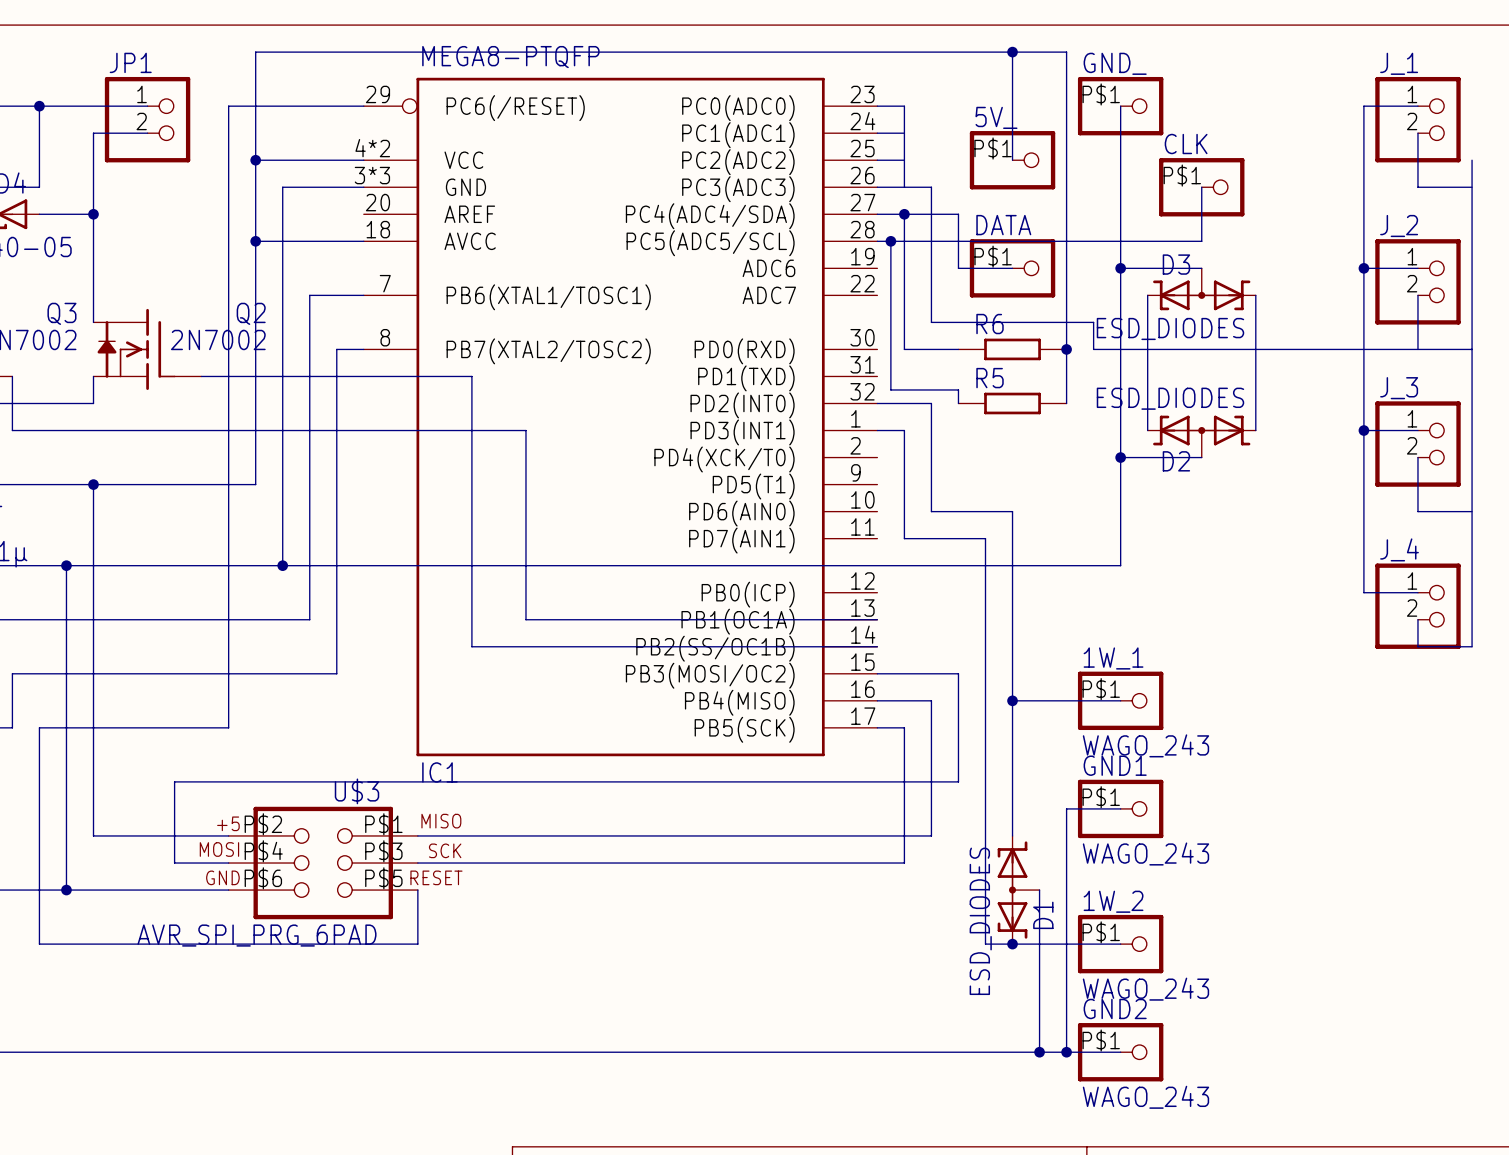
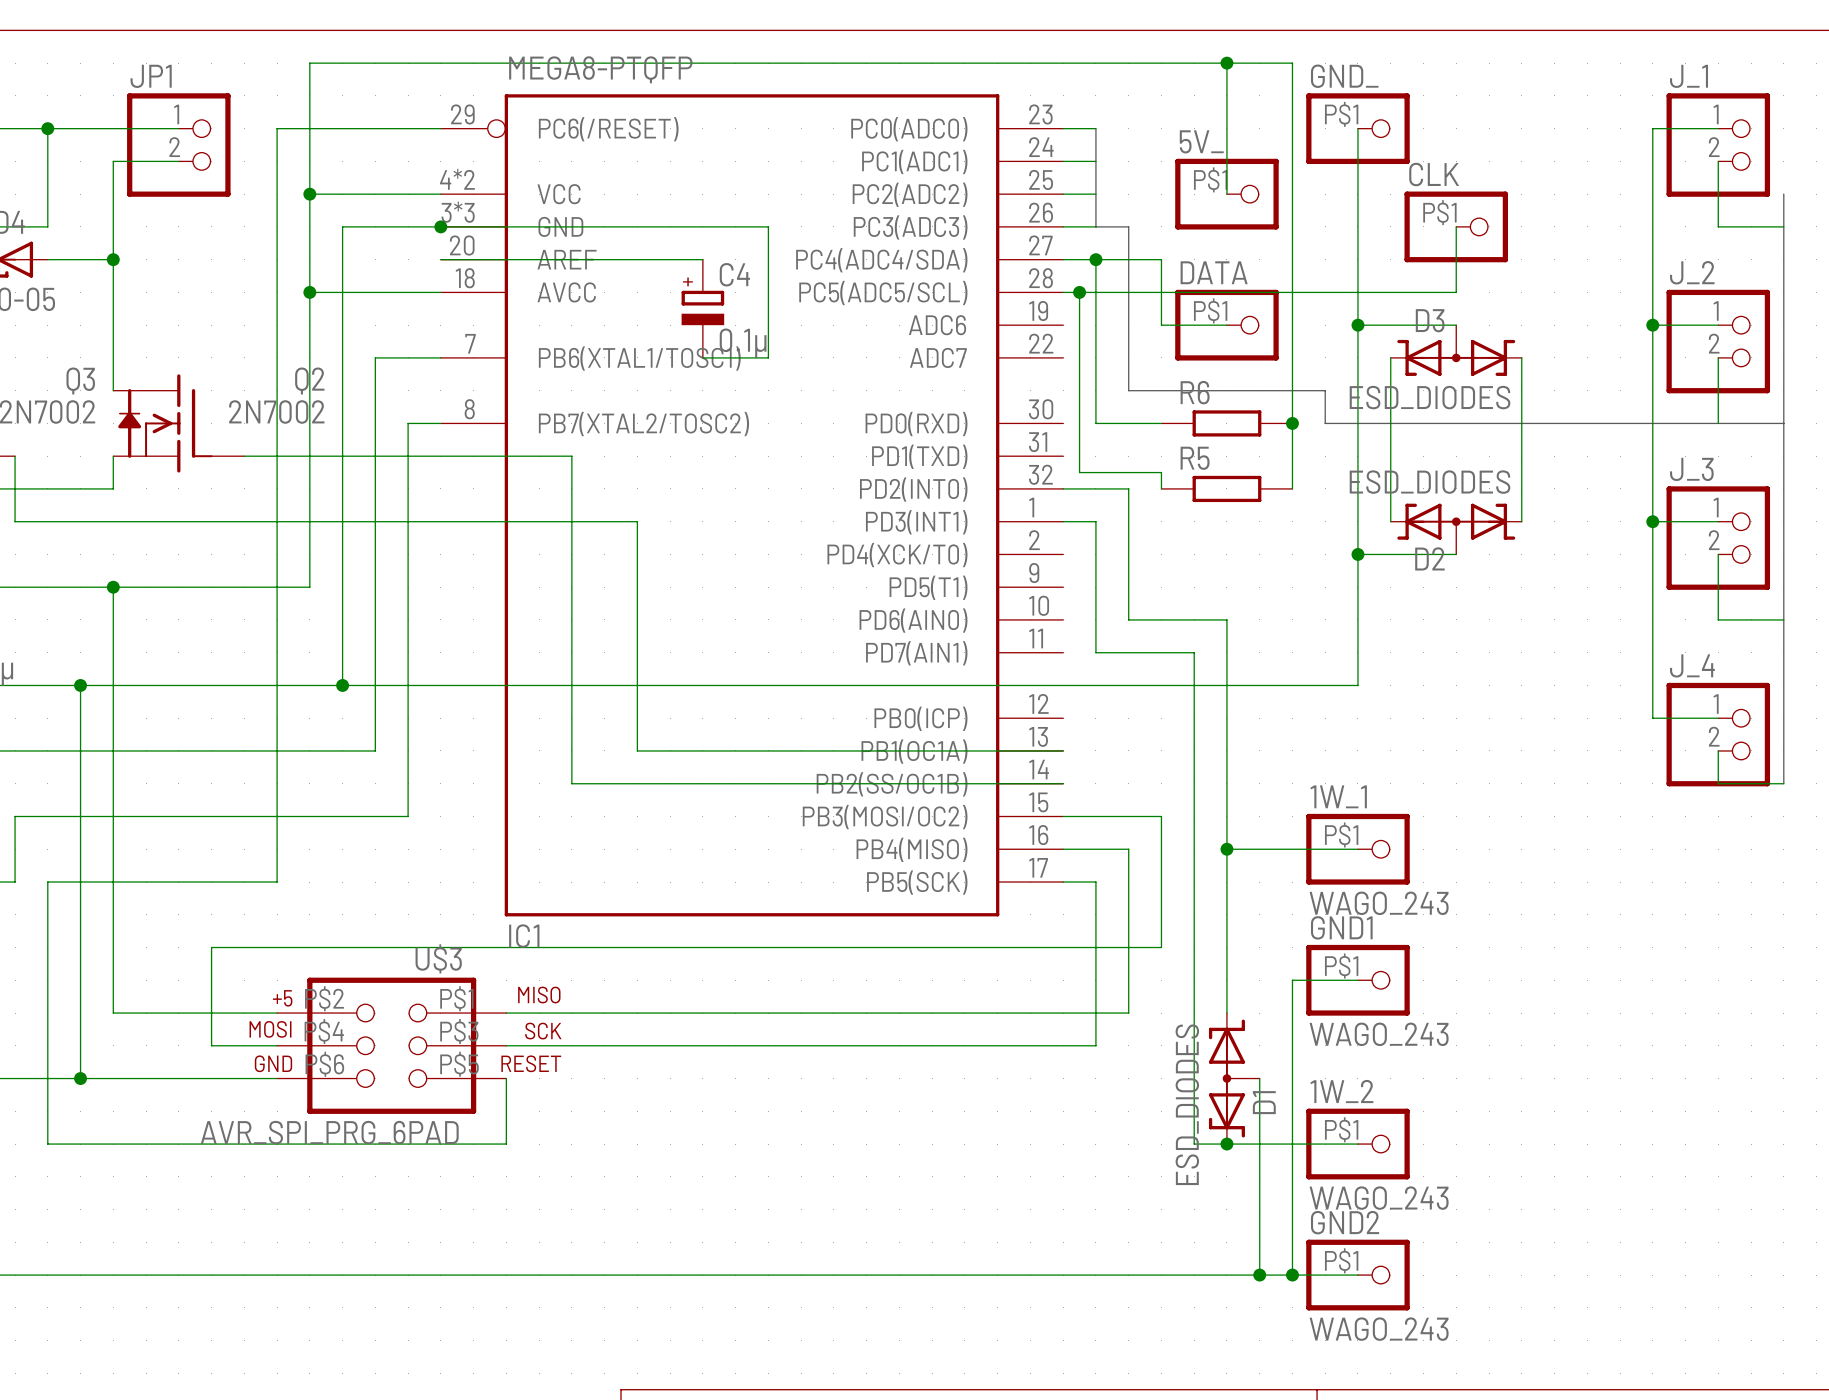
wire: none -> (440, 226) (768, 226) (768, 357) (702, 357)
junction: none -> (440, 226)
wire: none -> (440, 259) (702, 259)
C4: none -> 0.1µ (702, 308)

